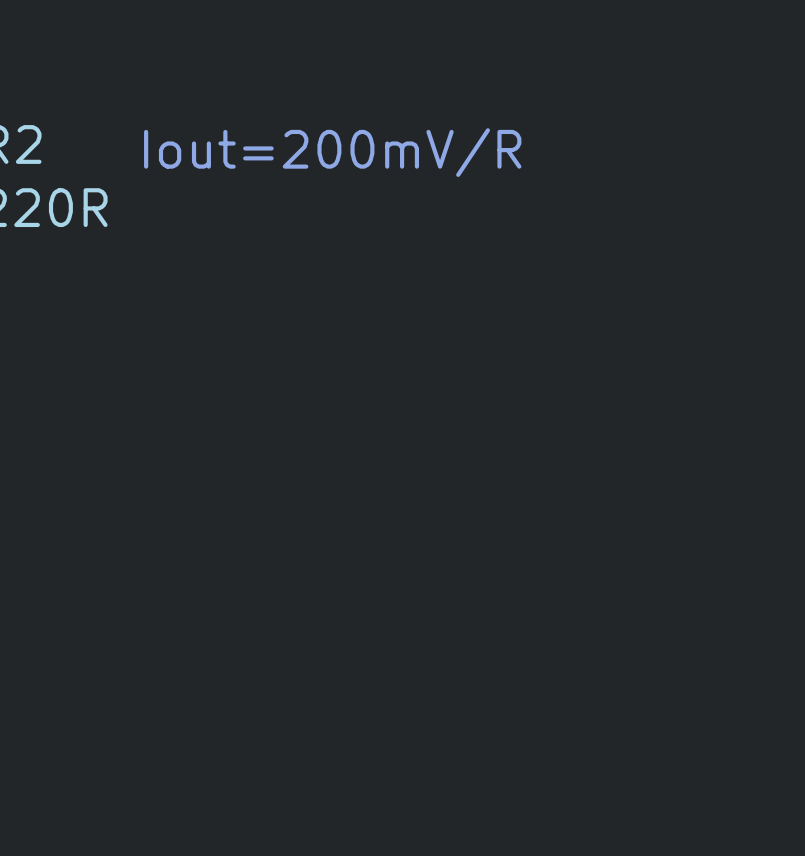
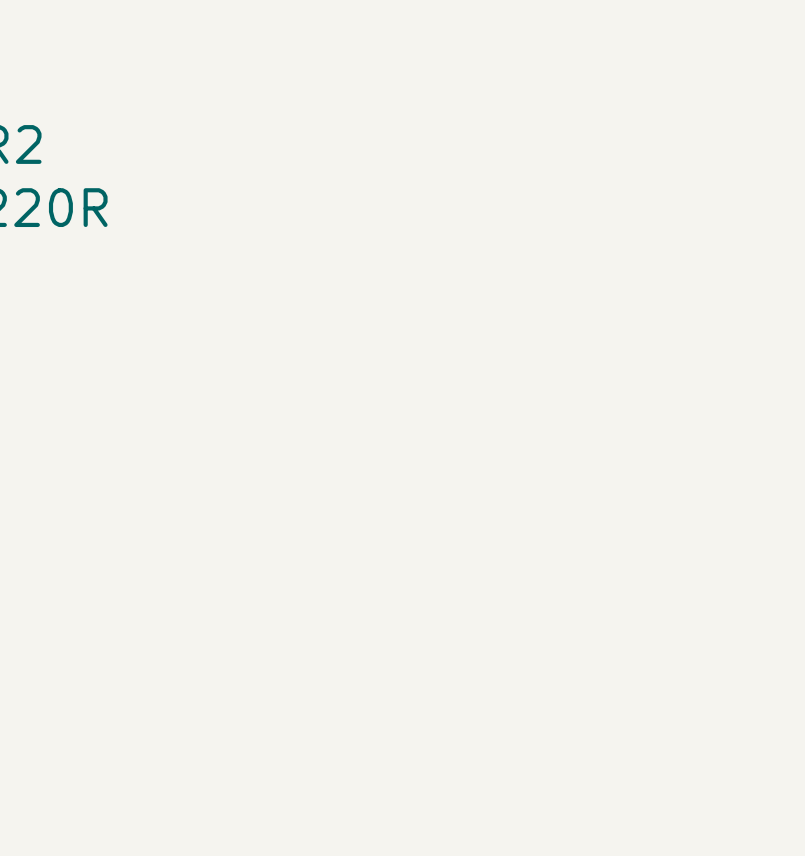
text: Iout=200mV/R (332, 152) -> none

